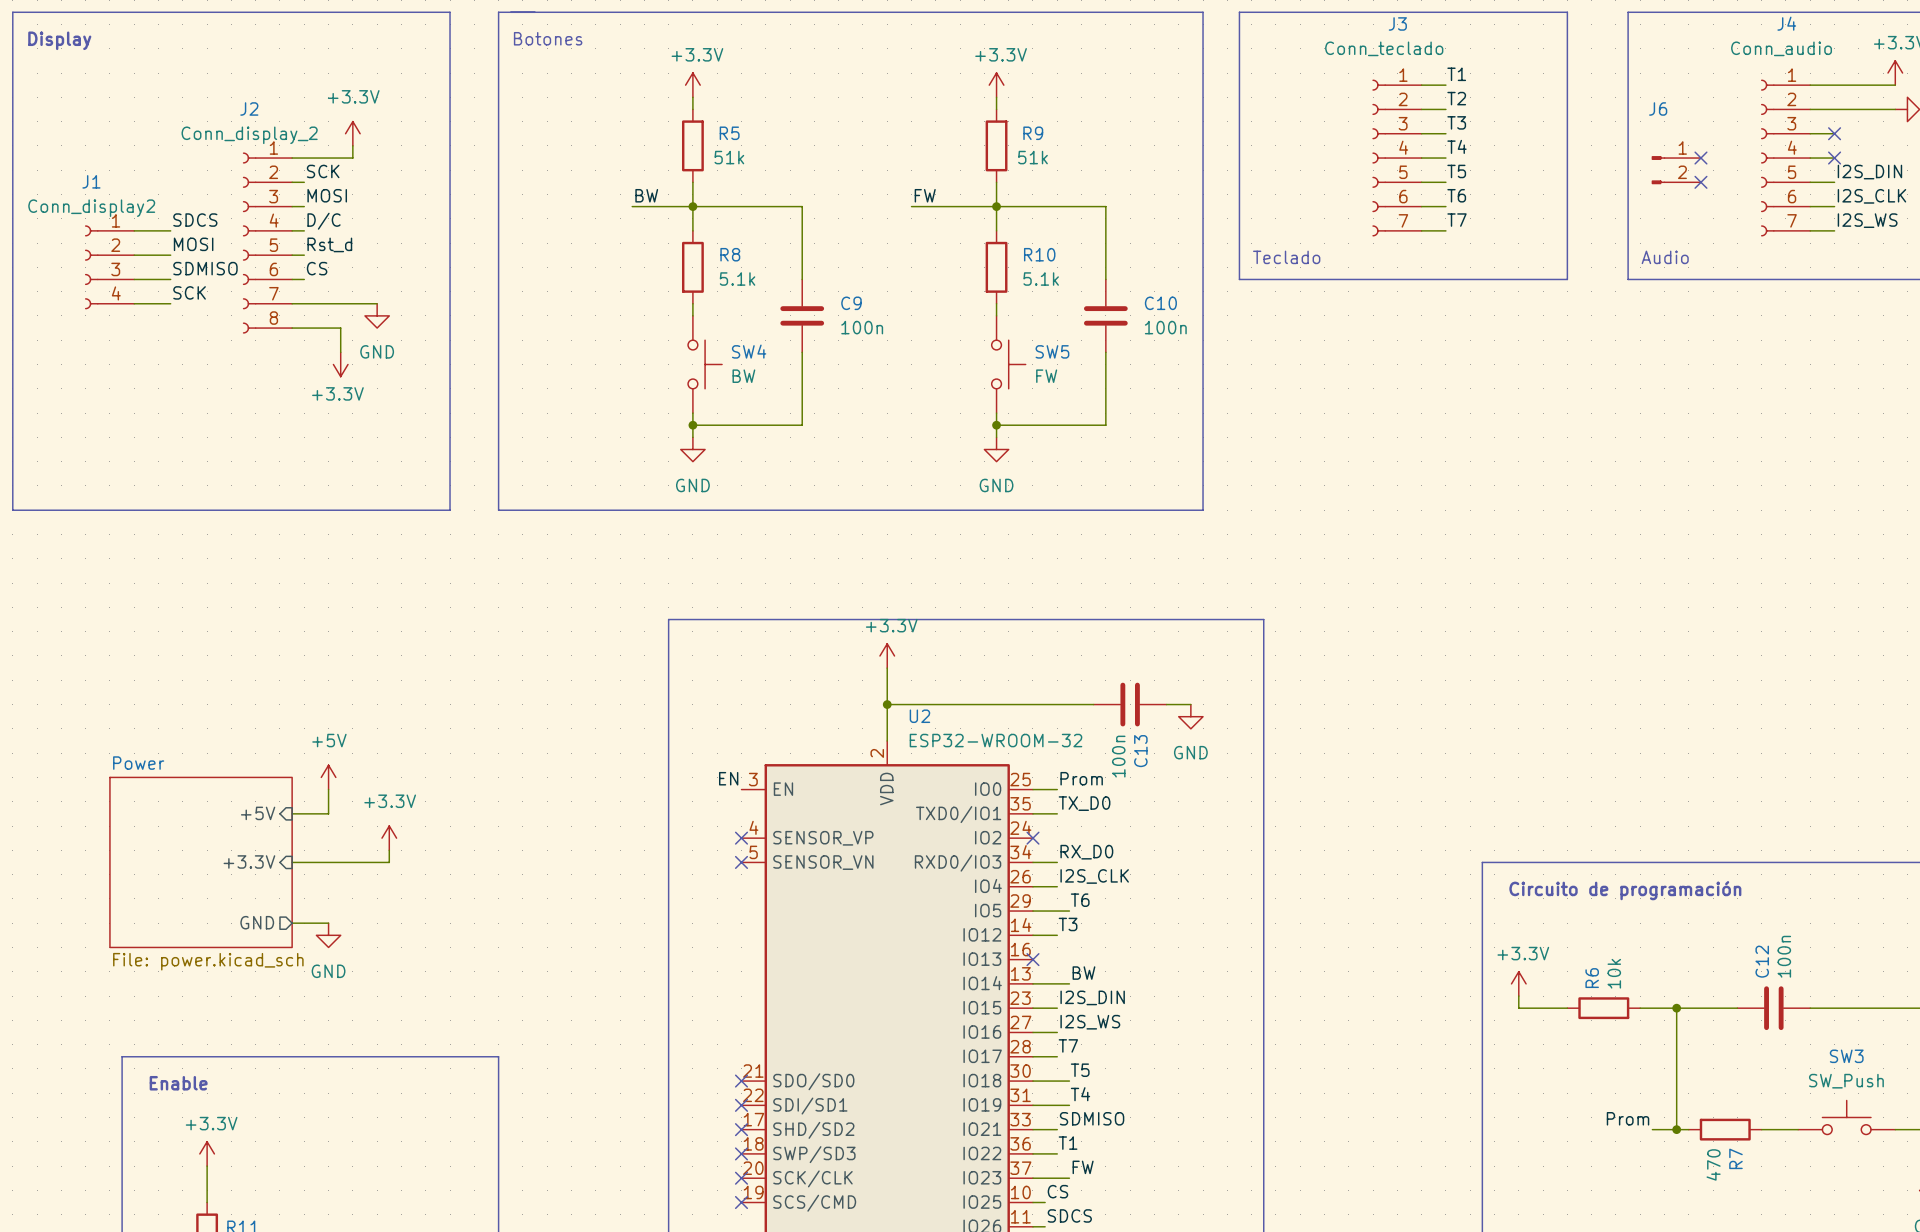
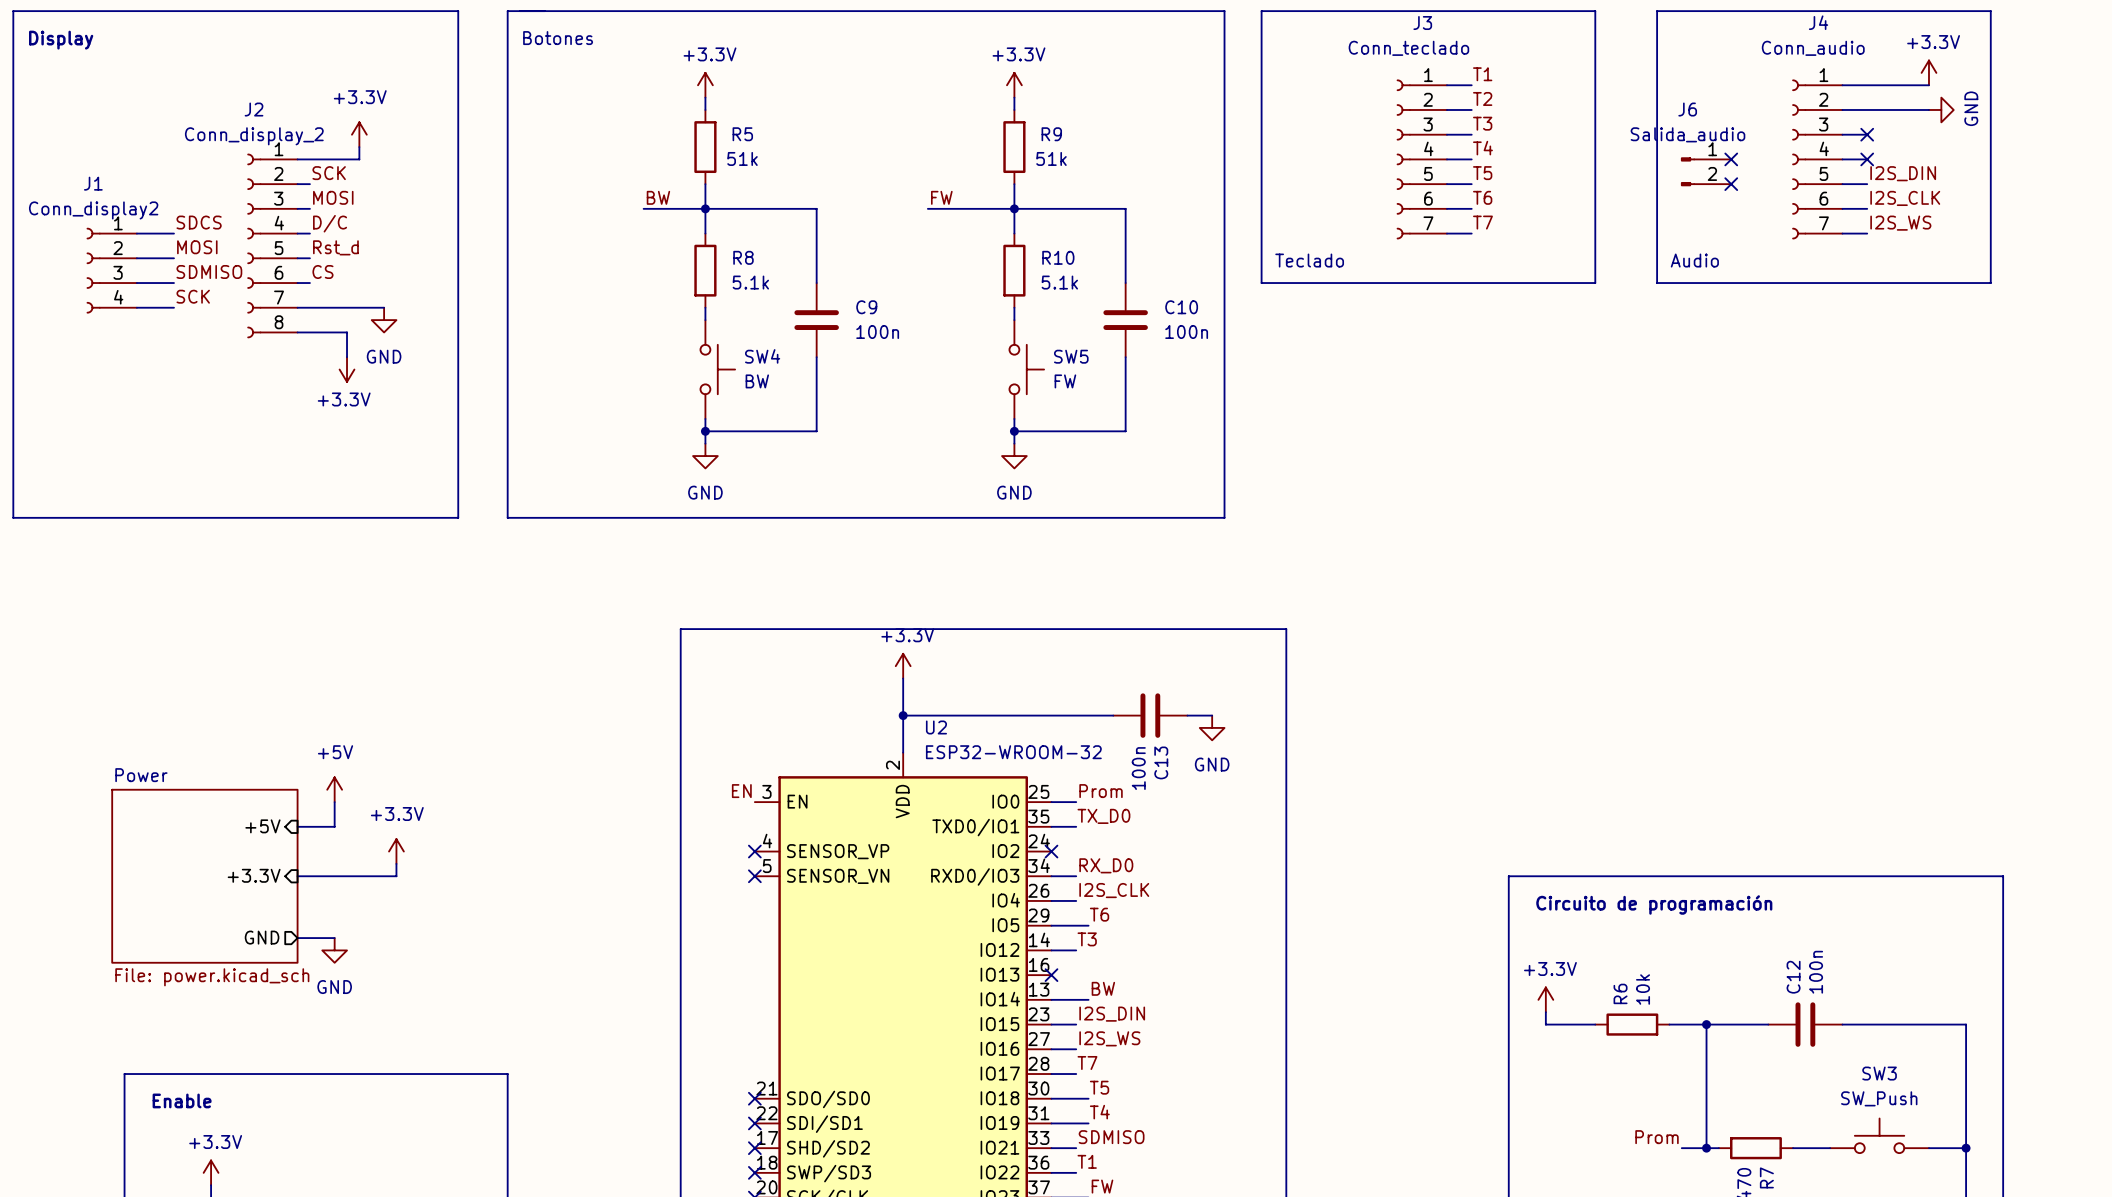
J6 value: none -> Salida_audio (1687, 134)

